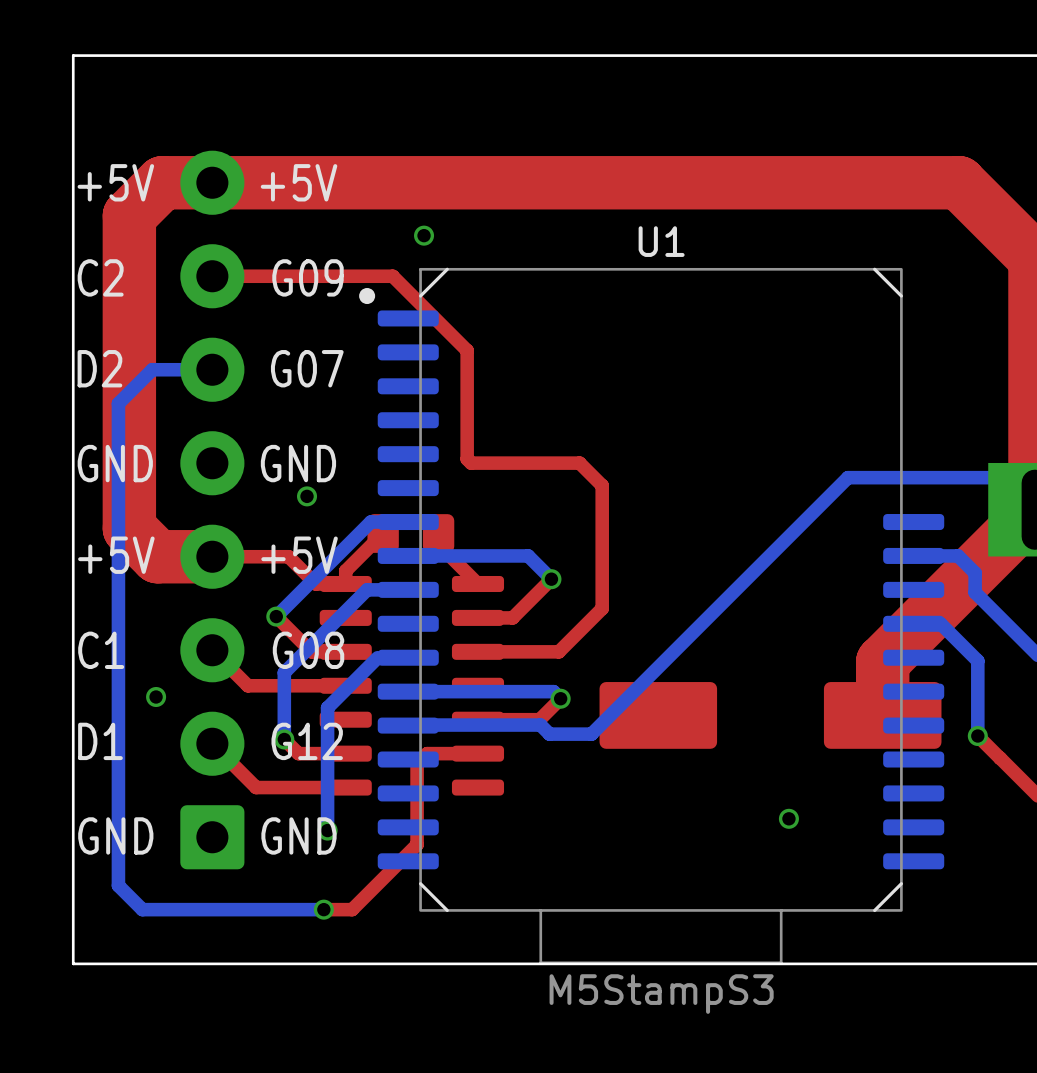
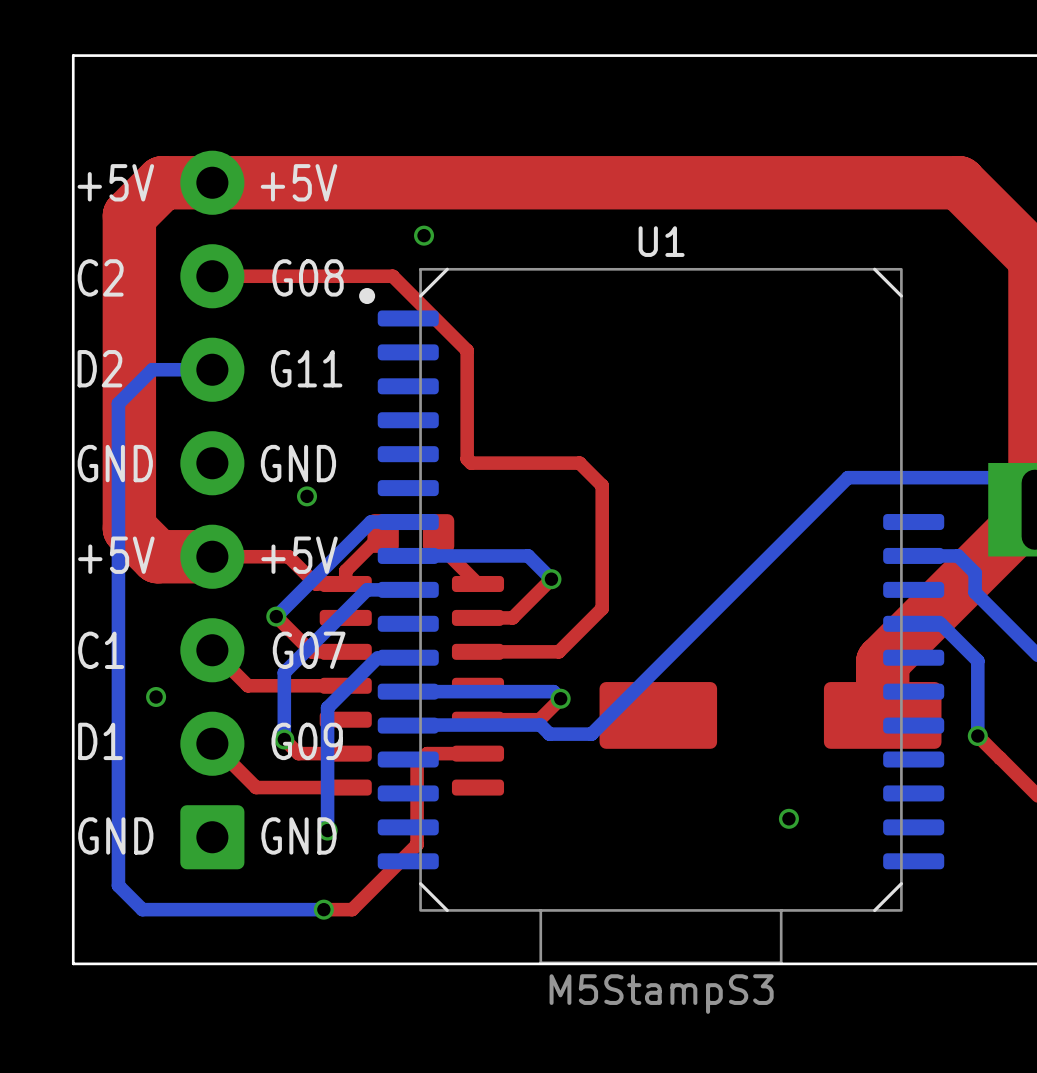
text: C2 G09 (210, 277) -> C2 G08 (210, 277)
text: D2 G07 (210, 368) -> D2 G11 (209, 368)
text: C1 G08 (211, 650) -> C1 G07 (211, 650)
text: D1 G12 (210, 741) -> D1 G09 (210, 741)

